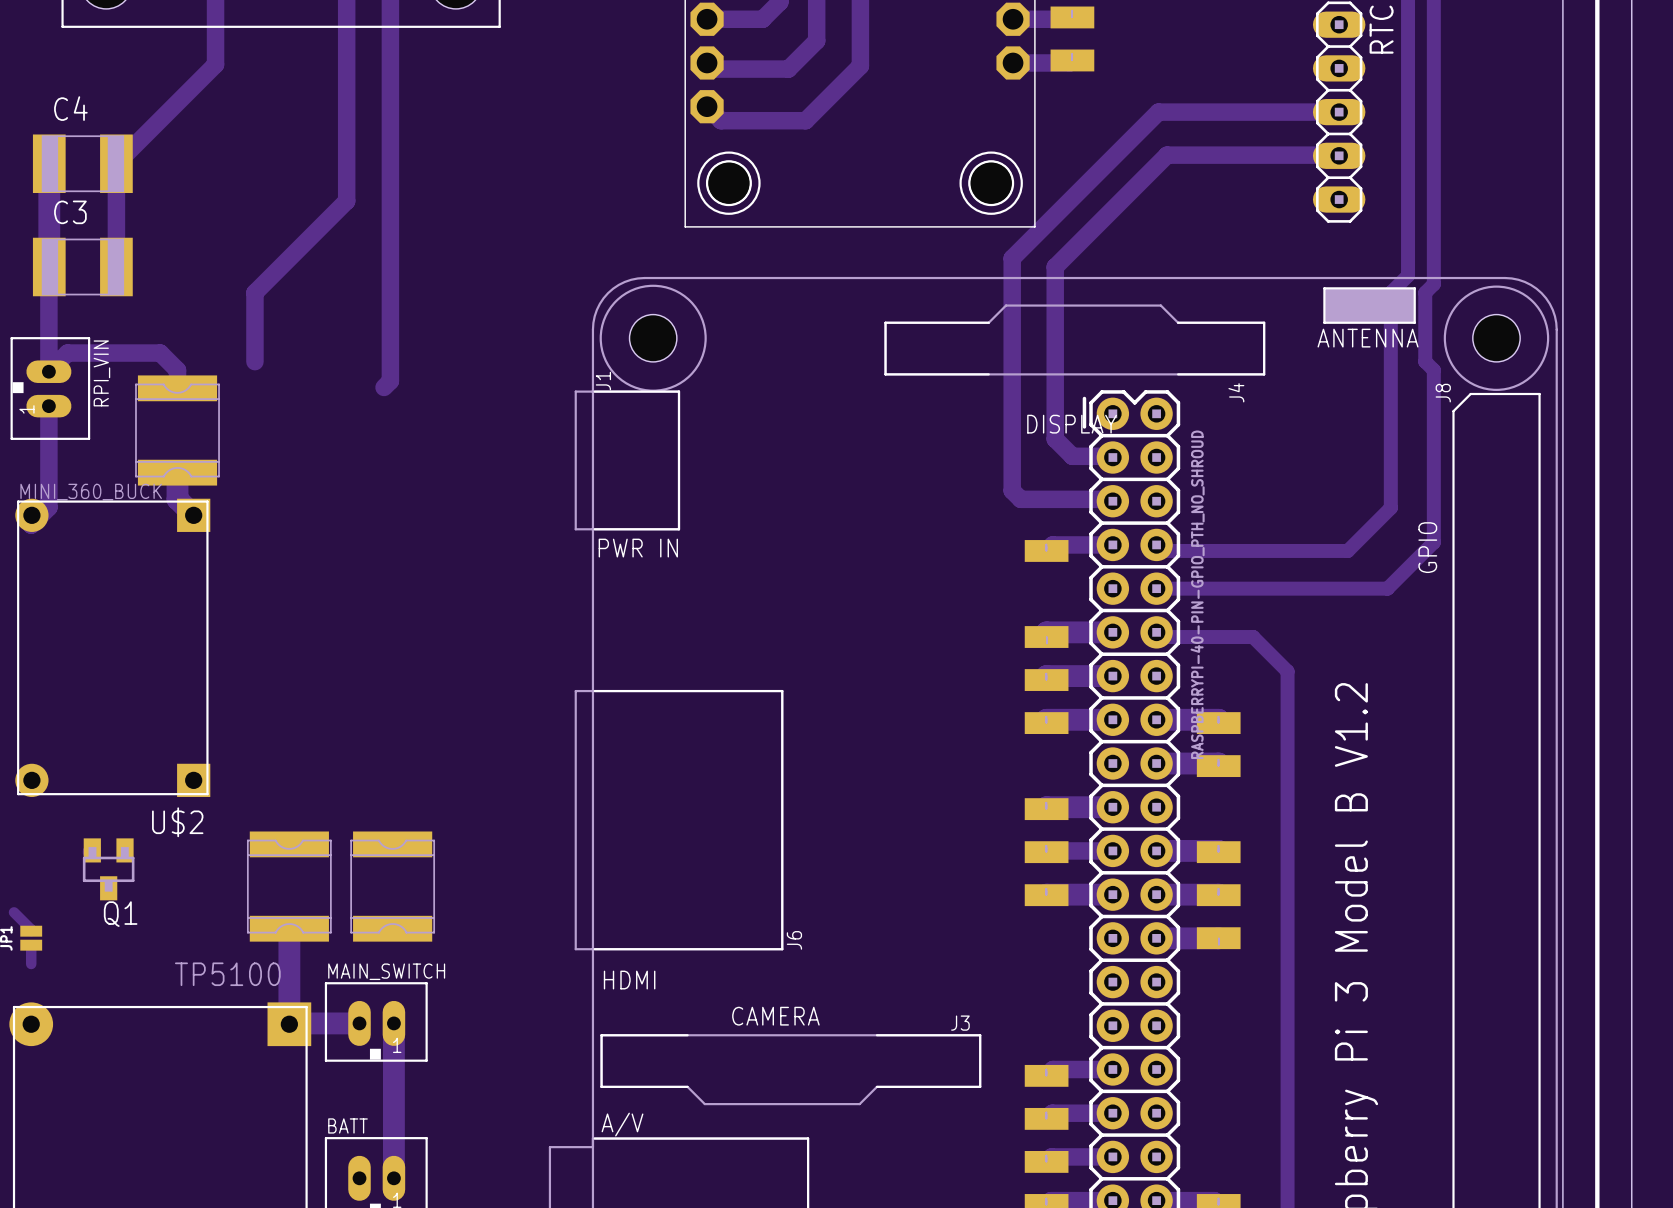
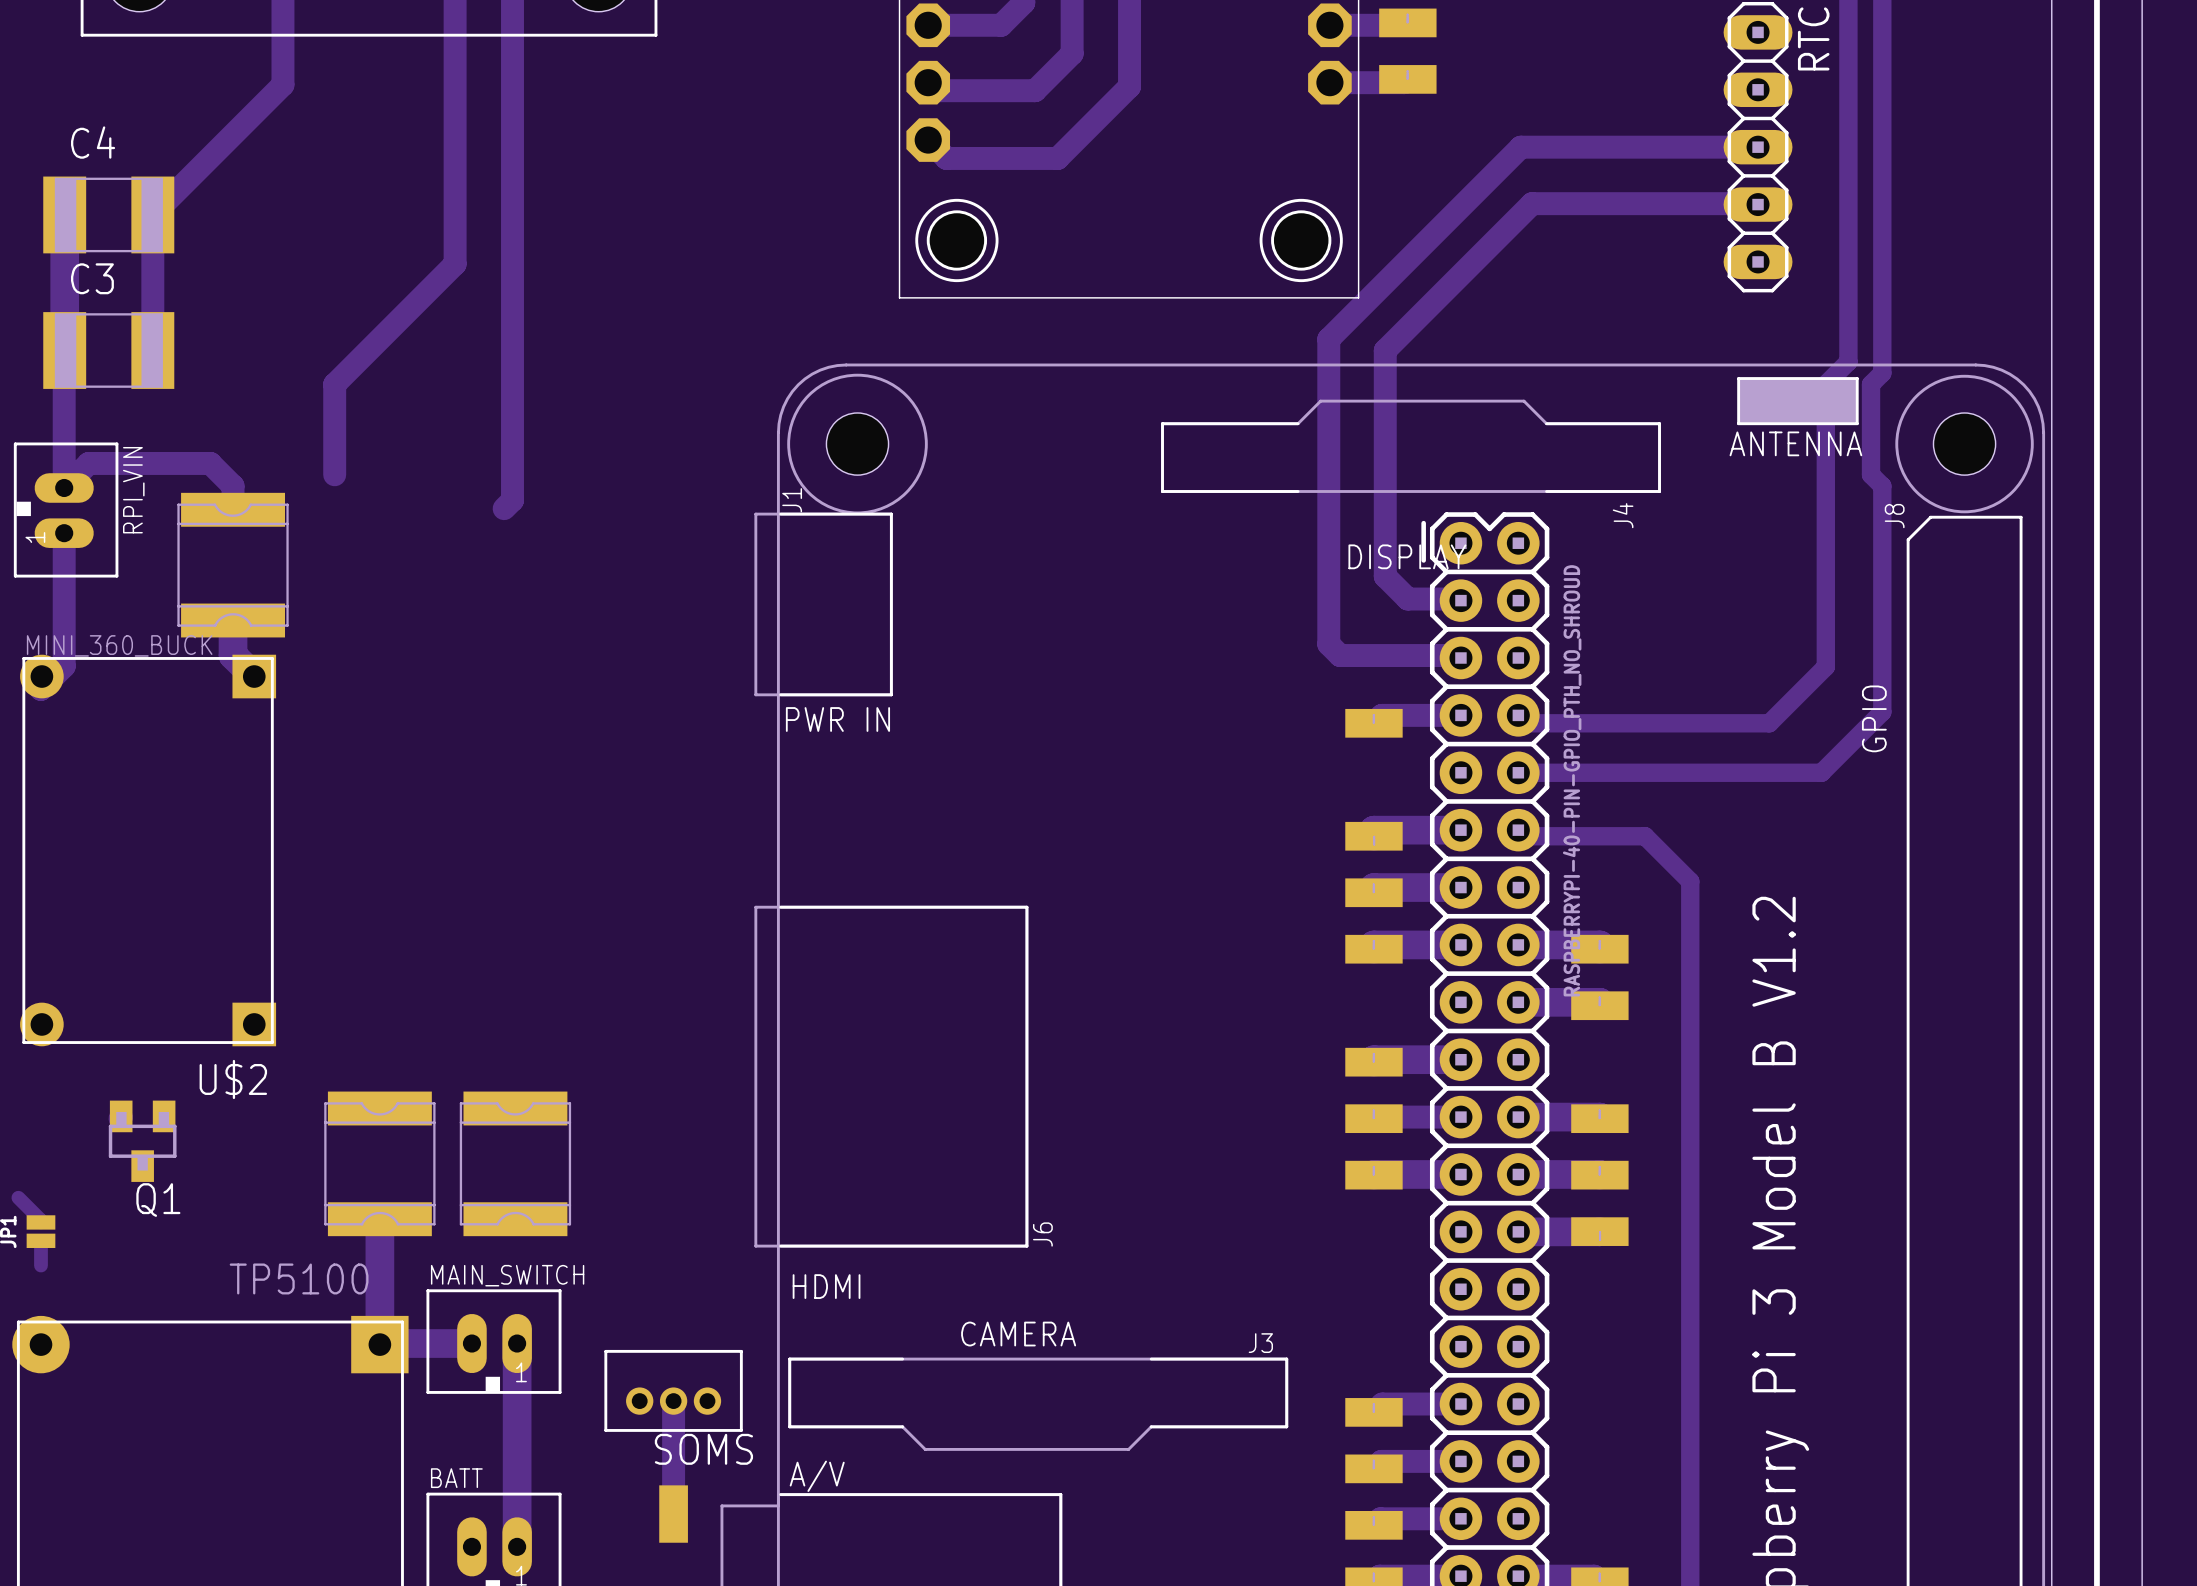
SOMS: none -> (673, 1390)
track: none -> (673, 1401) (673, 1514)
part: none -> (673, 1514)

